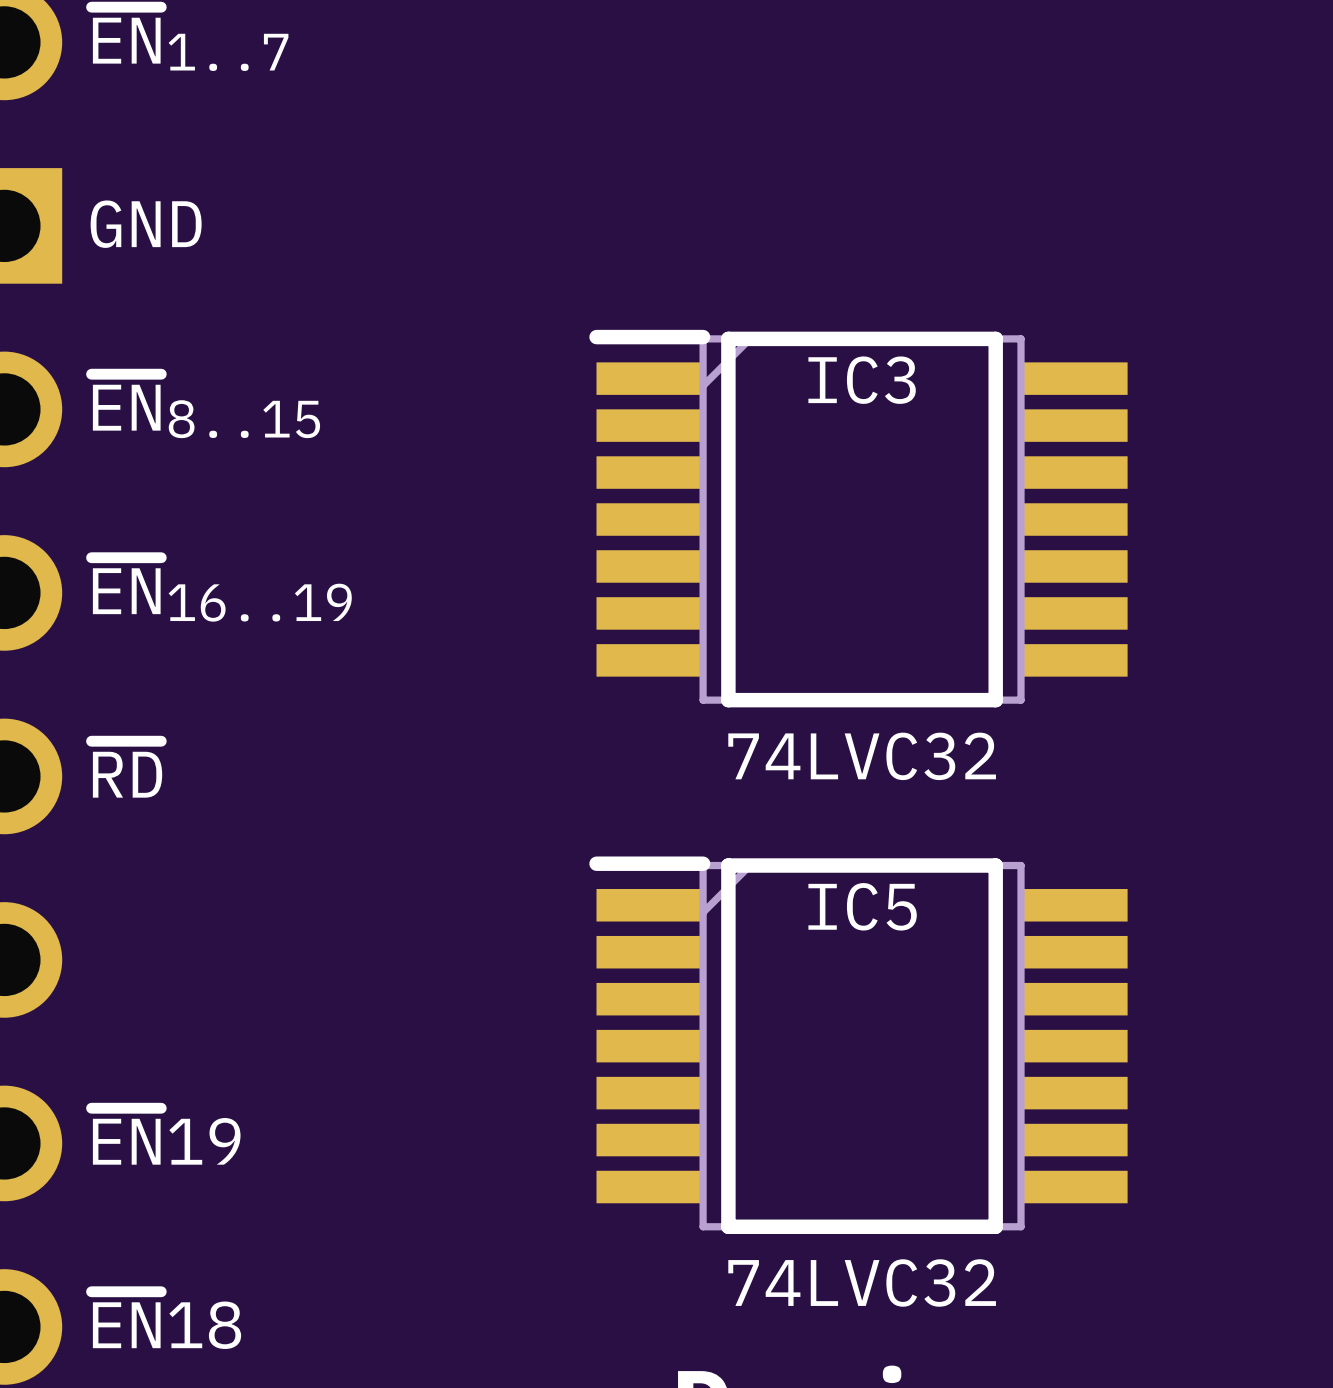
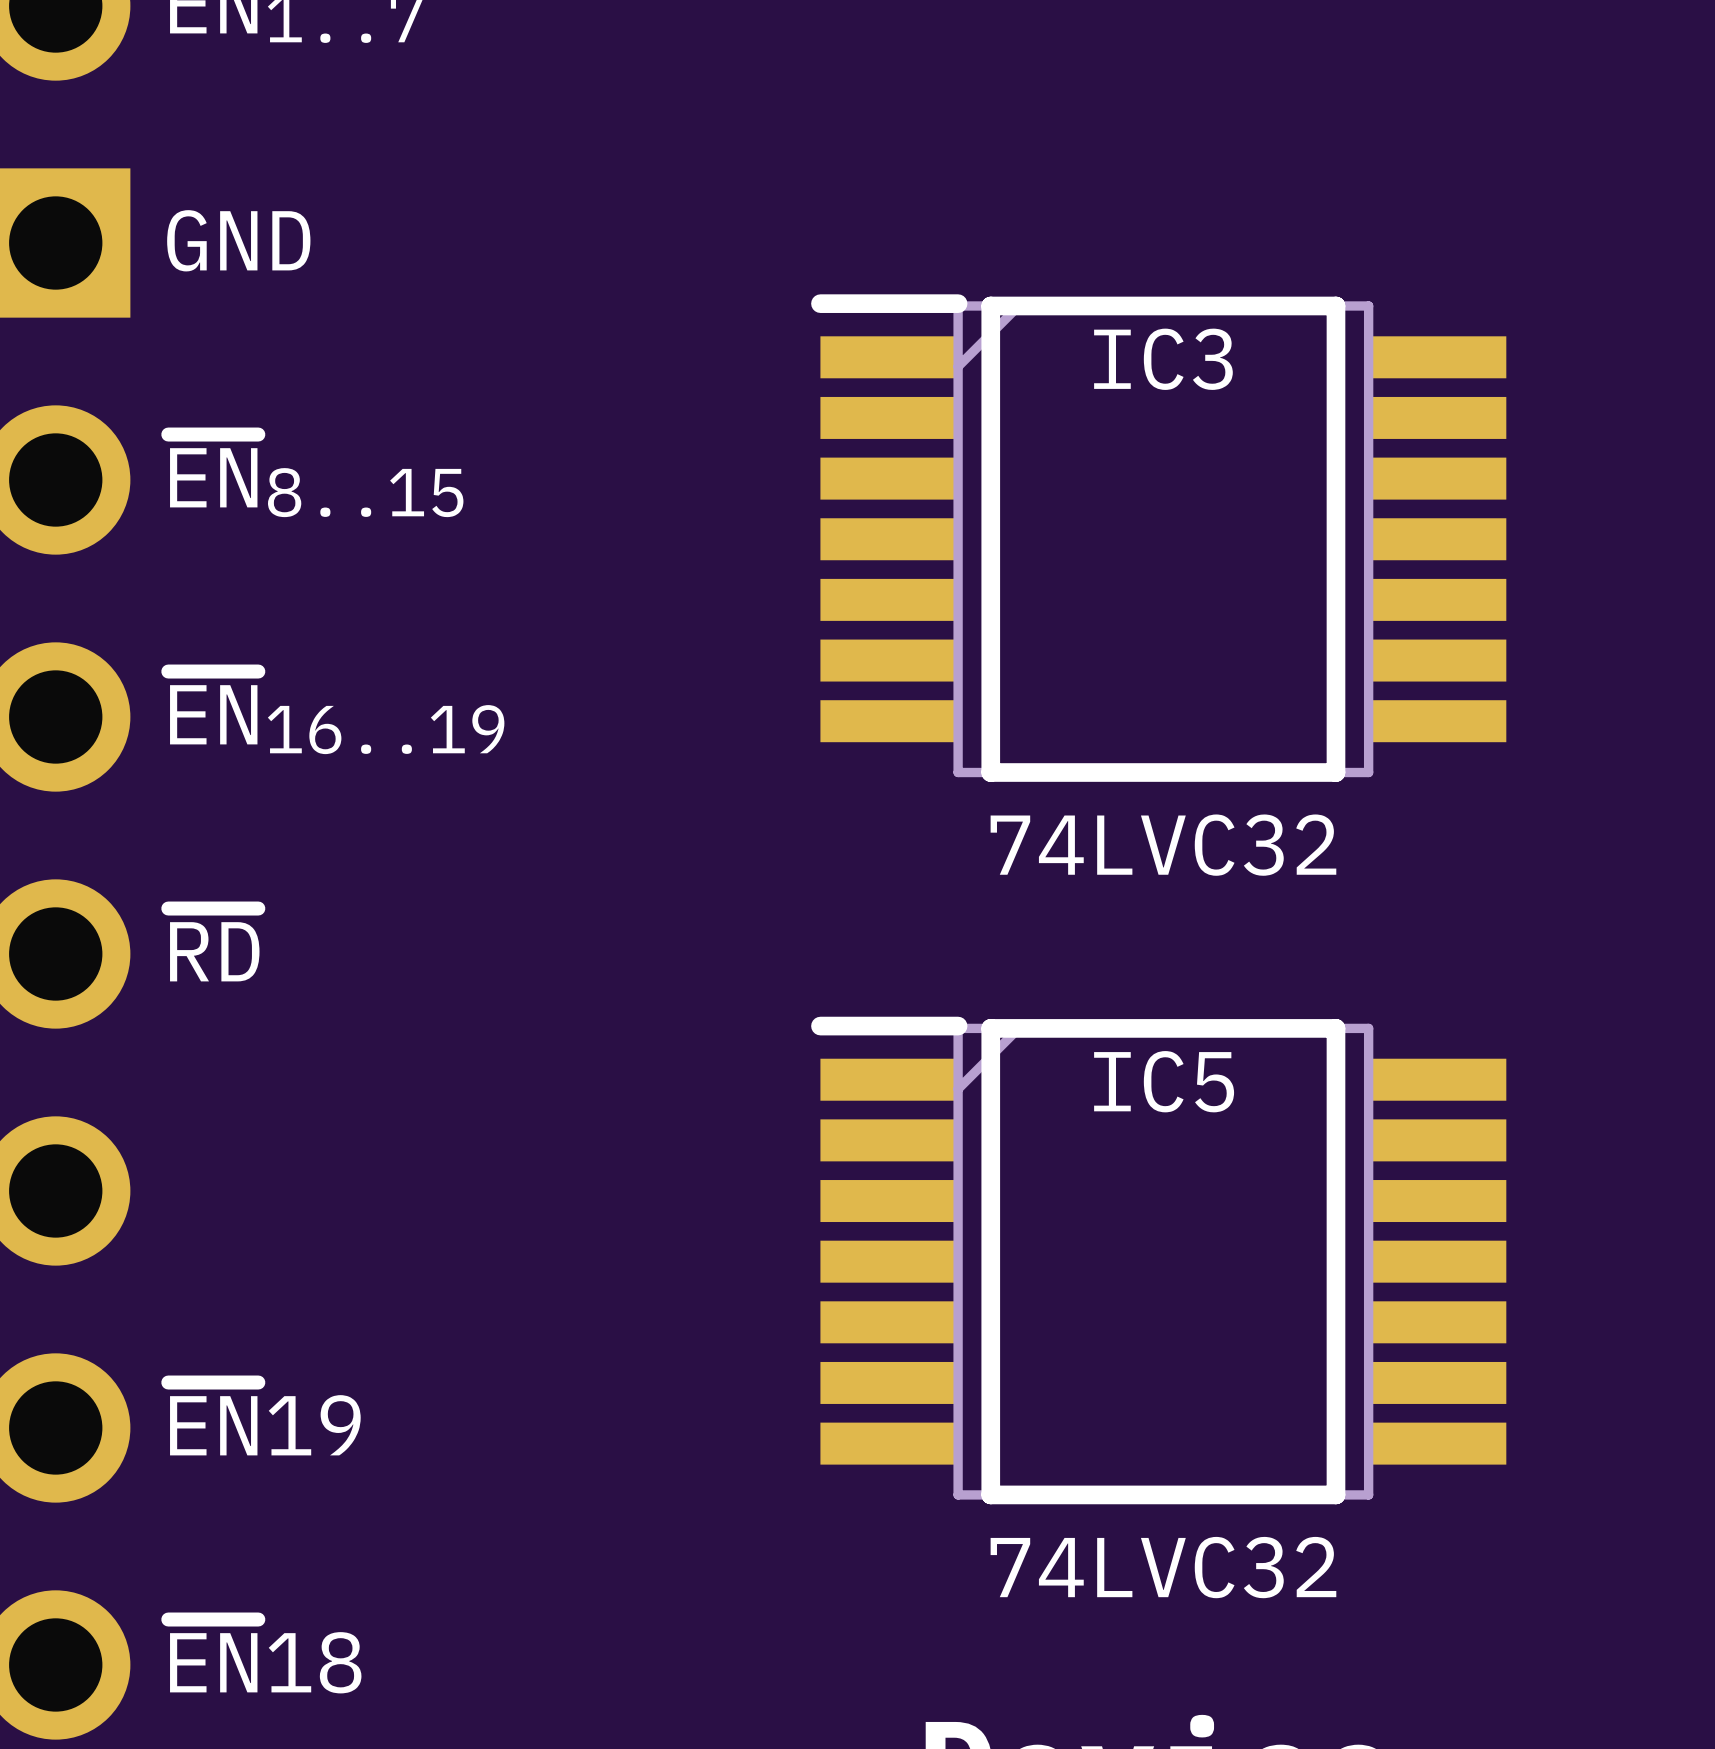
IC3 position: (858, 518) -> (1158, 538)
IC5 position: (858, 1045) -> (1158, 1260)

